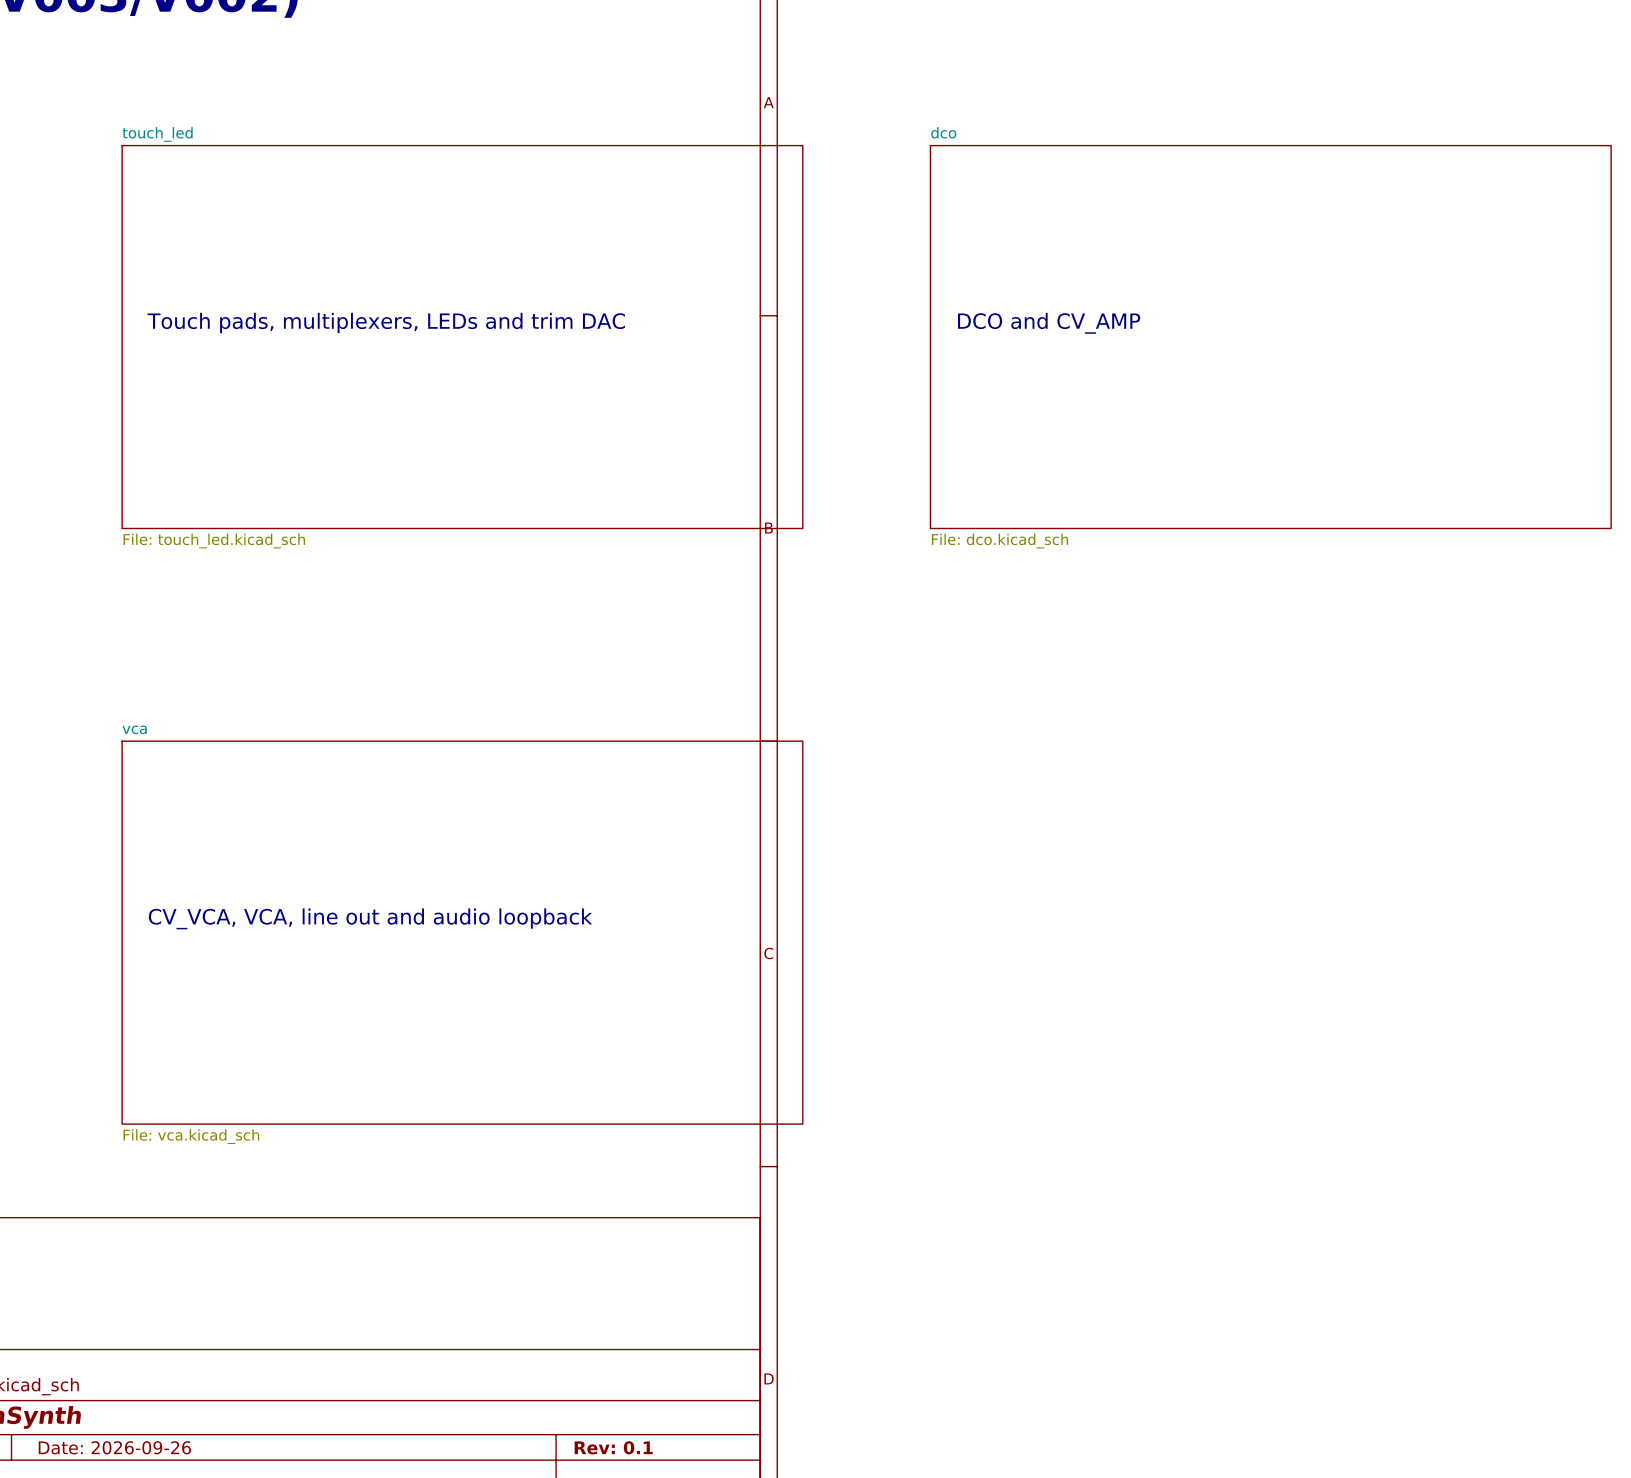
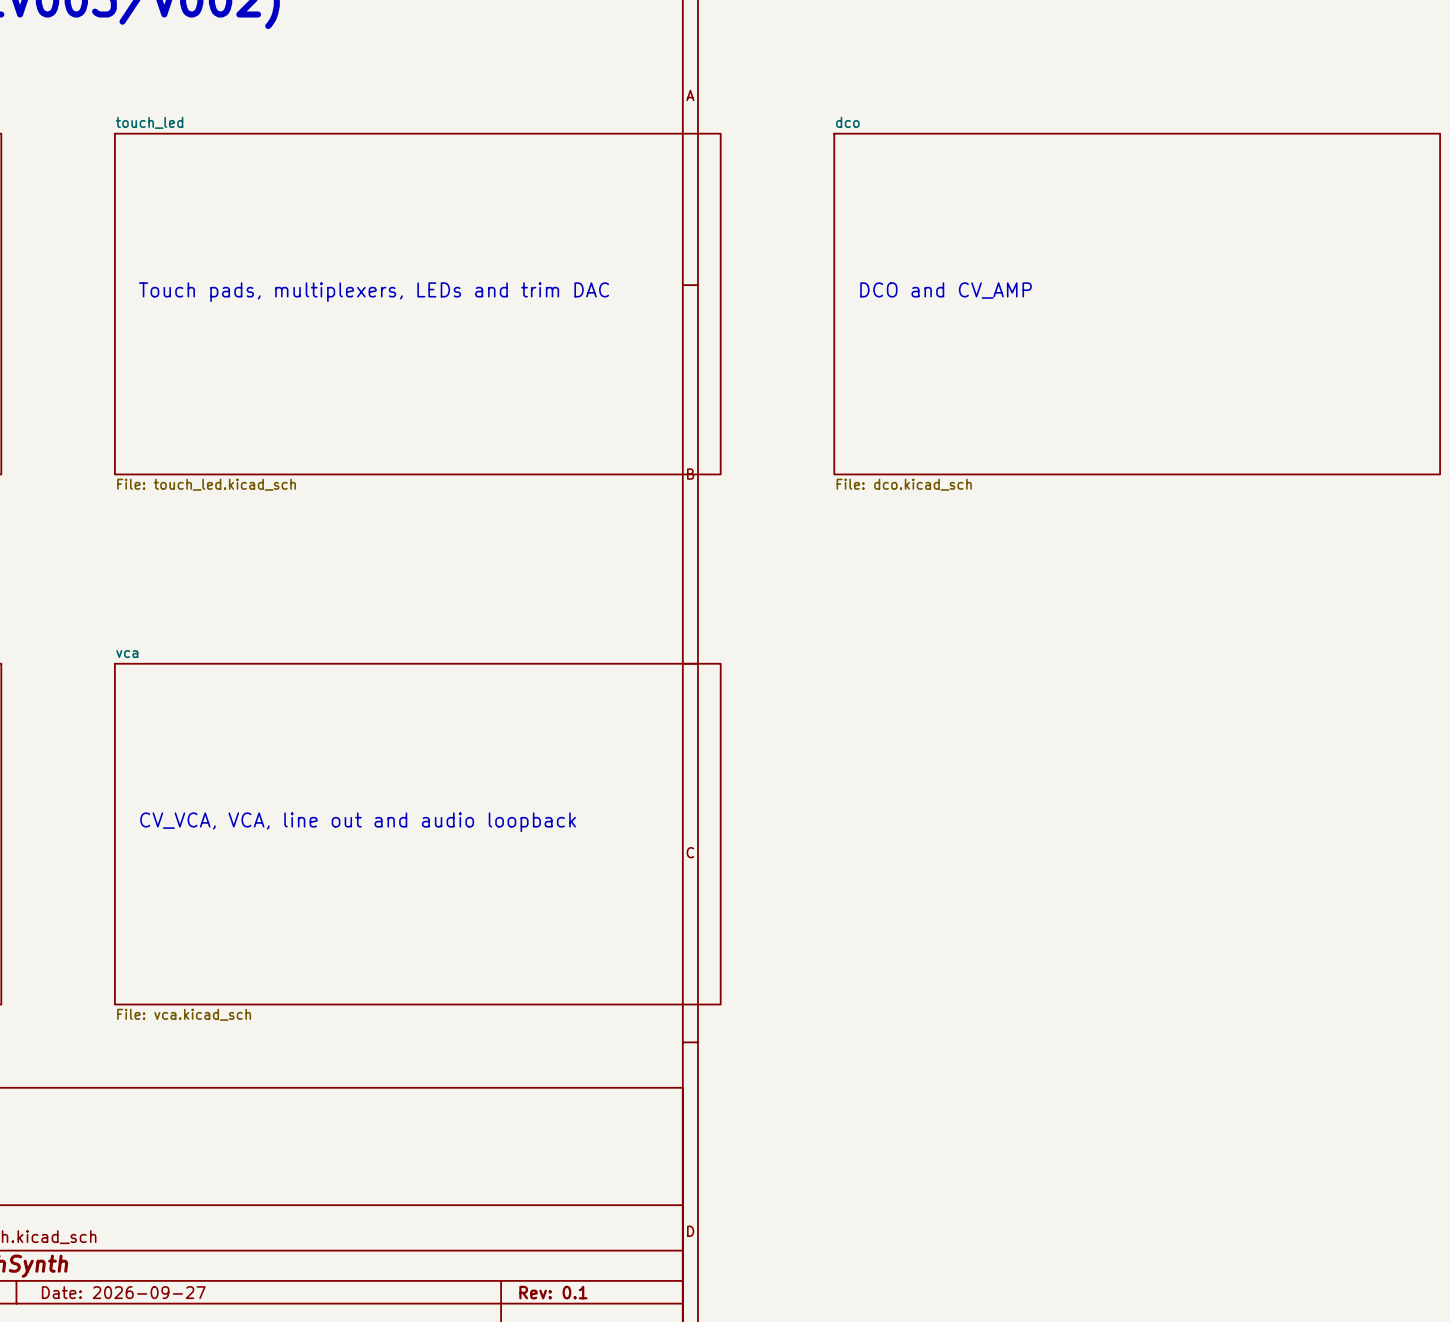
title block: Date: 2026-09-26 (114, 1447) -> Date: 2026-09-27 (123, 1292)

